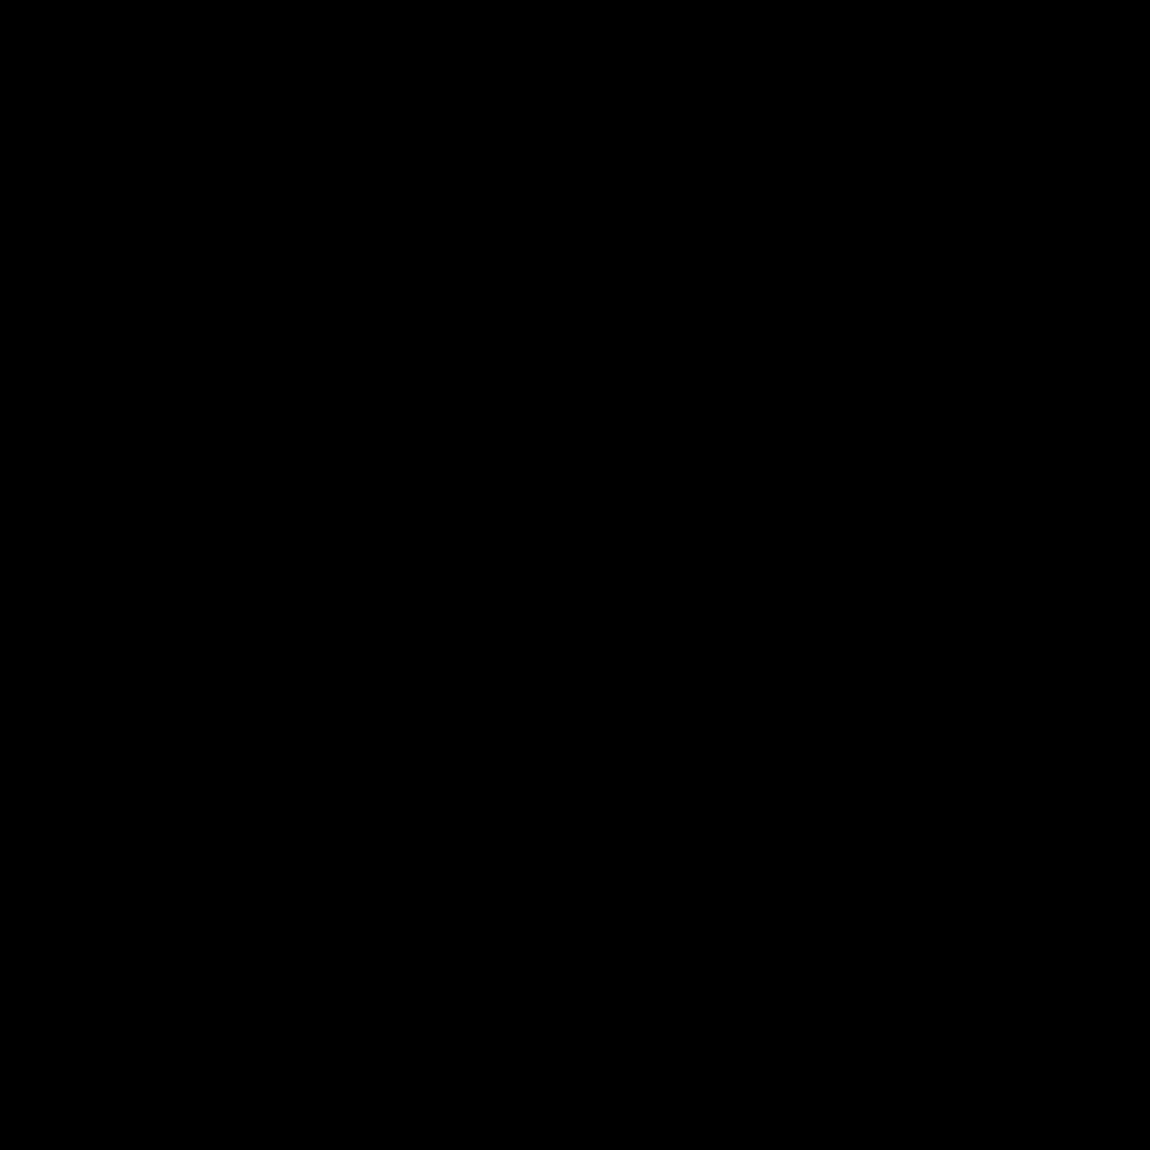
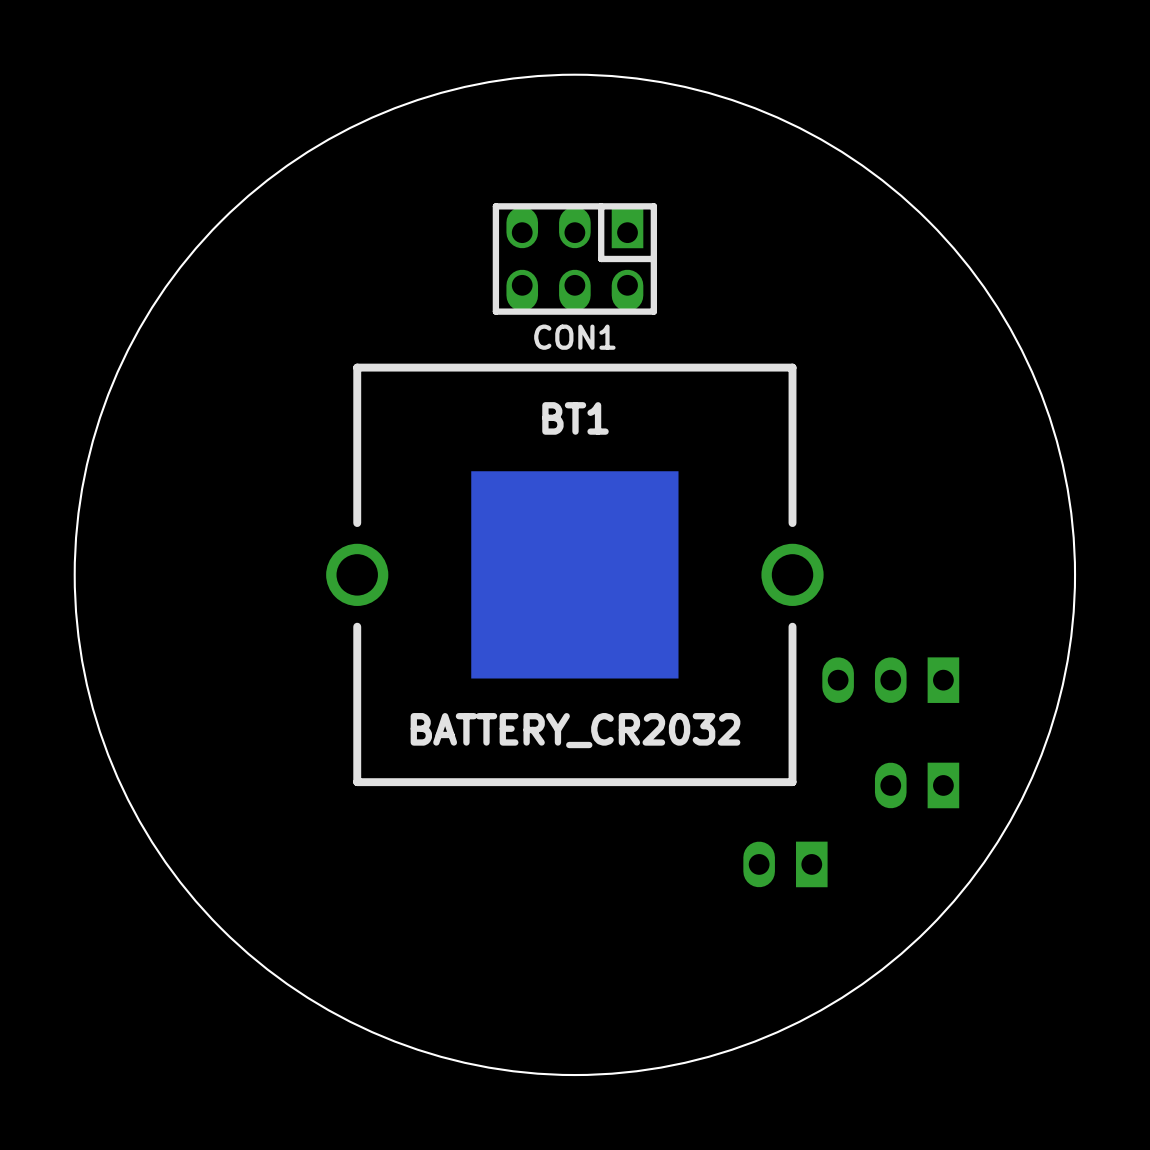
round board edge: none -> [73, 73, 1077, 1077]
CON1: none -> (574, 258)
BT1: none -> BATTERY_CR2032 (574, 574)
part: none -> (890, 680)
part: none -> (917, 785)
part: none -> (785, 864)

